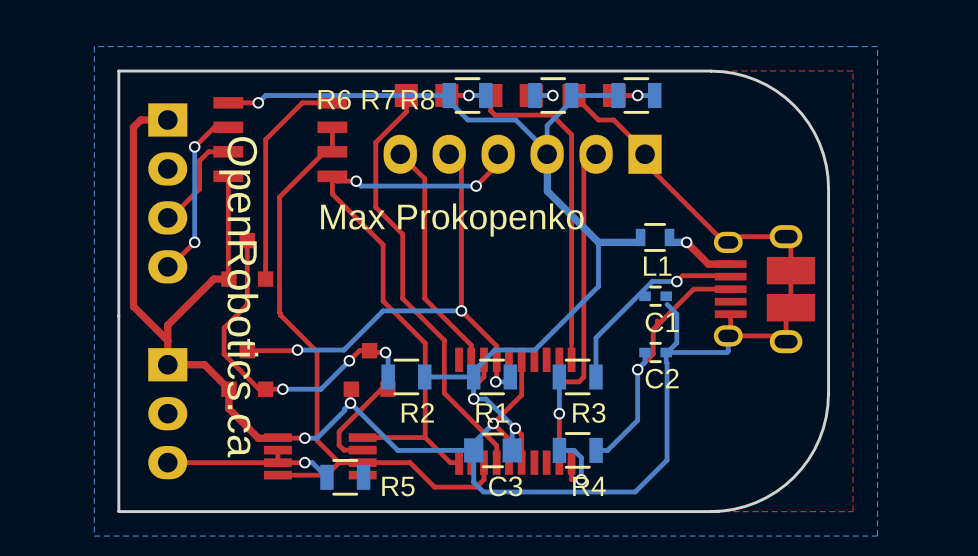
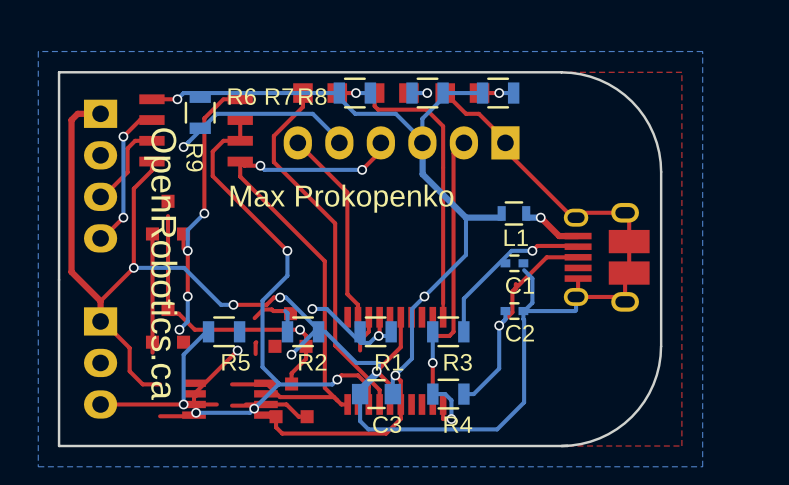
top track: (312, 102) (302, 102) (265, 139) (265, 266) -> (223, 99) (204, 118) (204, 213)
R9: none -> (200, 112)
top track: (375, 142) (375, 207) (402, 234) (402, 298) (444, 340) -> (277, 132) (273, 136) (273, 162) (335, 223) (335, 300)
top track: (324, 151) (279, 197) (279, 312) (317, 351) (317, 440) (339, 462) (326, 475) (277, 475) -> (233, 140) (223, 140) (212, 151) (212, 176) (287, 250)
bottom track: none -> (339, 142) (339, 140) (312, 113) (216, 113) (183, 147)
top track: (449, 154) (461, 166) (461, 310) (496, 346) (496, 359) -> none
via: none -> (183, 147)
top track: (424, 178) (424, 298) (458, 332) -> (318, 163) (347, 192) (347, 294)
top track: (228, 186) (228, 279) (213, 279) (167, 325) (167, 340) -> (151, 170) (133, 188) (133, 267) (100, 301)
bottom track: none -> (204, 213) (187, 230) (187, 250)
via: none -> (204, 213)
top track: (383, 244) (383, 301) (425, 343) (425, 437) -> (283, 219) (324, 261) (324, 387) (341, 404)
part position: (247, 259) -> (168, 217)
top track: none -> (152, 233) (152, 352)
top track: none -> (187, 250) (187, 296)
via: none -> (187, 250)
bottom track: none -> (287, 250) (287, 275) (262, 300) (262, 367) (278, 384)
via: none -> (287, 250)
bottom track: none -> (133, 267) (184, 267) (221, 304) (233, 304)
via: none -> (133, 267)
top track: (247, 304) (224, 327) (224, 354) (259, 389) (282, 389) -> (168, 270) (168, 313)
bottom track: (461, 310) (383, 310) (343, 350) (297, 350) -> none
via: (461, 310) -> none
bottom track: none -> (187, 296) (187, 321) (179, 329)
via: none -> (187, 296)
via: none -> (424, 296)
bottom track: none -> (280, 297) (286, 297) (315, 326) (315, 331)
top track: none -> (280, 297) (273, 297) (266, 304) (233, 304)
via: none -> (280, 297)
via: none -> (233, 304)
top track: (297, 350) (247, 350) -> none
via: (297, 350) -> none
bottom track: none -> (312, 308) (326, 308) (360, 342) (369, 342) (374, 338)
via: none -> (312, 308)
bottom track: (534, 350) (494, 350) (473, 371) -> (412, 308) (412, 358) (392, 377)
via: (385, 352) -> none
top track: none -> (168, 313) (178, 313) (194, 329) (300, 329) (306, 335) (306, 358) (291, 373) (291, 384)
bottom track: (349, 360) (320, 389) (282, 389) -> none
via: (349, 360) -> none
top track: (170, 364) (204, 364) (228, 389) (228, 408) (258, 438) (304, 438) -> (103, 321) (129, 348) (129, 371) (142, 384) (160, 384)
part position: (369, 369) -> (290, 330)
via: none -> (179, 329)
bottom track: none -> (208, 329) (183, 354) (183, 404)
via: none -> (300, 329)
bottom track: none -> (318, 331) (314, 331) (291, 354)
bottom track: (432, 376) (473, 376) (473, 399) (485, 399) (515, 428) (512, 431) -> (325, 331) (356, 362) (378, 362) (378, 373) (360, 392)
via: (282, 389) -> none
top track: (387, 389) (381, 389) (339, 431) (339, 445) (343, 450) (362, 450) -> none
top track: none -> (237, 350) (196, 392) (196, 396)
via: none -> (237, 350)
via: (473, 399) -> none
via: (350, 403) -> none
via: none -> (291, 354)
R1 name position: R1 (492, 412) -> R1 (389, 362)
bottom track: none -> (337, 379) (332, 384) (278, 384)
via: none -> (337, 379)
top track: (425, 437) (451, 462) -> none
top track: (425, 437) (362, 437) -> none
bottom track: (304, 438) (317, 438) (350, 403) (397, 450) (473, 450) -> none
via: (304, 438) -> none
top track: none -> (232, 384) (267, 384) (280, 397) (334, 397) (337, 400)
bottom track: none -> (278, 384) (250, 412) (196, 412)
part: none -> (291, 400)
via: none -> (183, 404)
bottom track: (304, 462) (312, 462) (326, 477) -> none
via: (304, 462) -> none
top track: none -> (286, 404) (298, 416) (307, 416)
top track: (483, 462) (483, 479) (476, 487) (434, 487) (410, 462) (386, 462) -> (368, 404) (368, 386) (358, 375) (341, 375) (337, 379)
top track: none -> (400, 404) (400, 418) (386, 433) (282, 433) (276, 427) (276, 416)
top track: none -> (232, 405) (251, 405) (254, 408)
via: none -> (254, 408)
top track: none -> (196, 412) (192, 416) (160, 416)
via: none -> (196, 412)
R5 position: (345, 477) -> (224, 331)
R5 name position: R5 (398, 486) -> R5 (236, 362)

